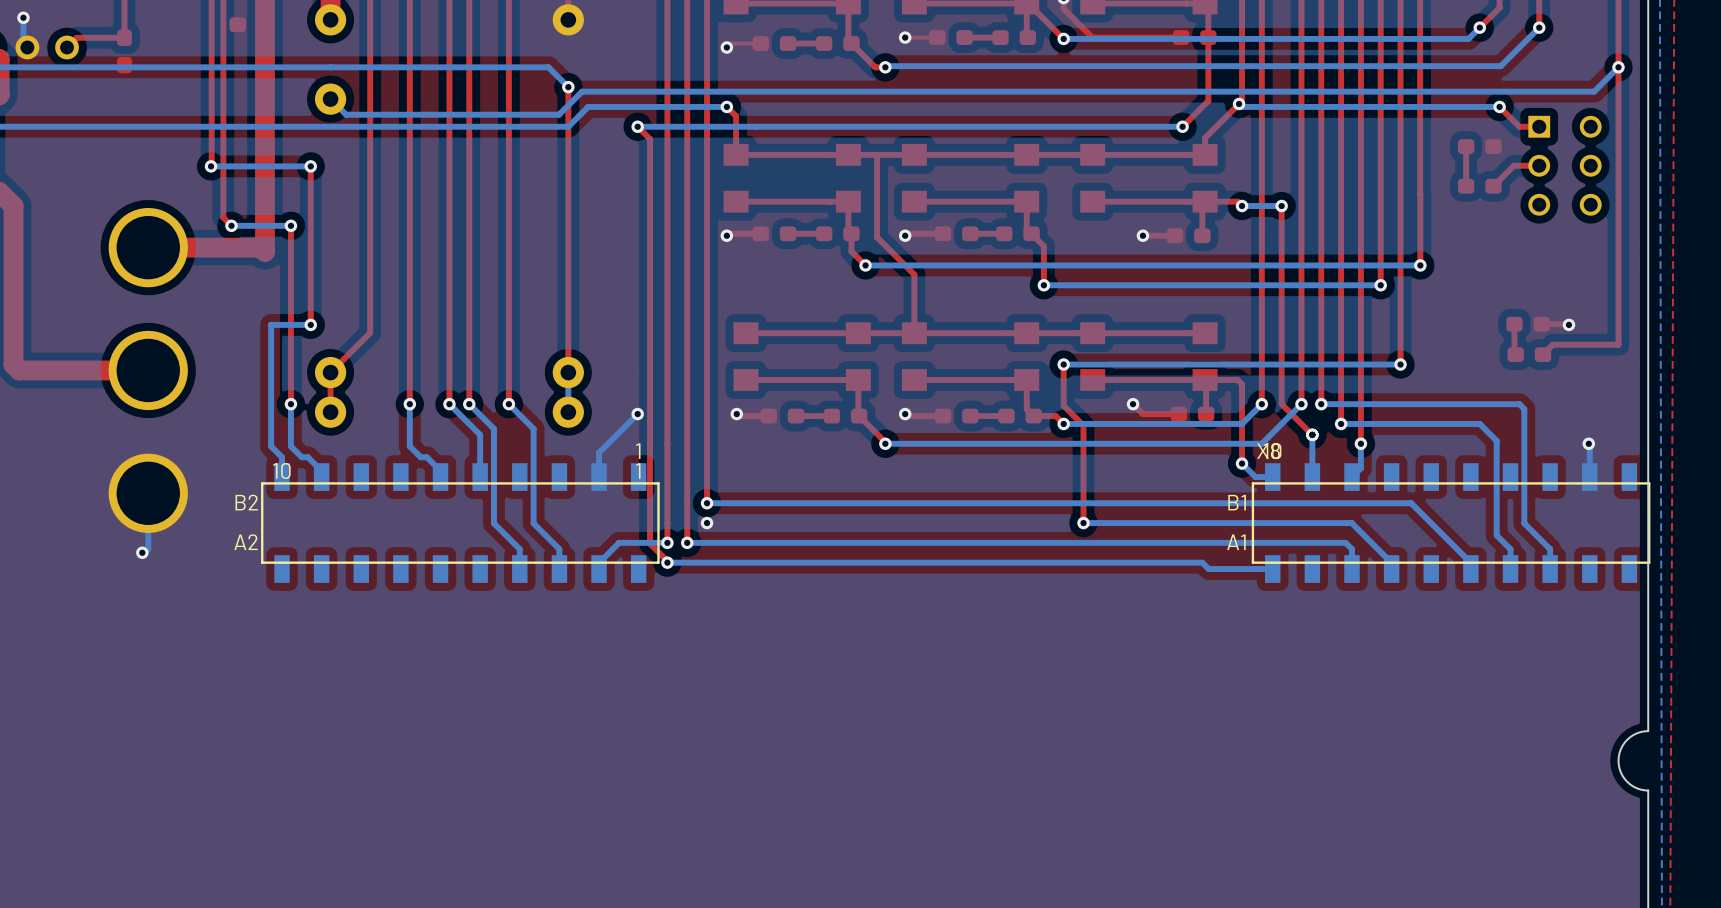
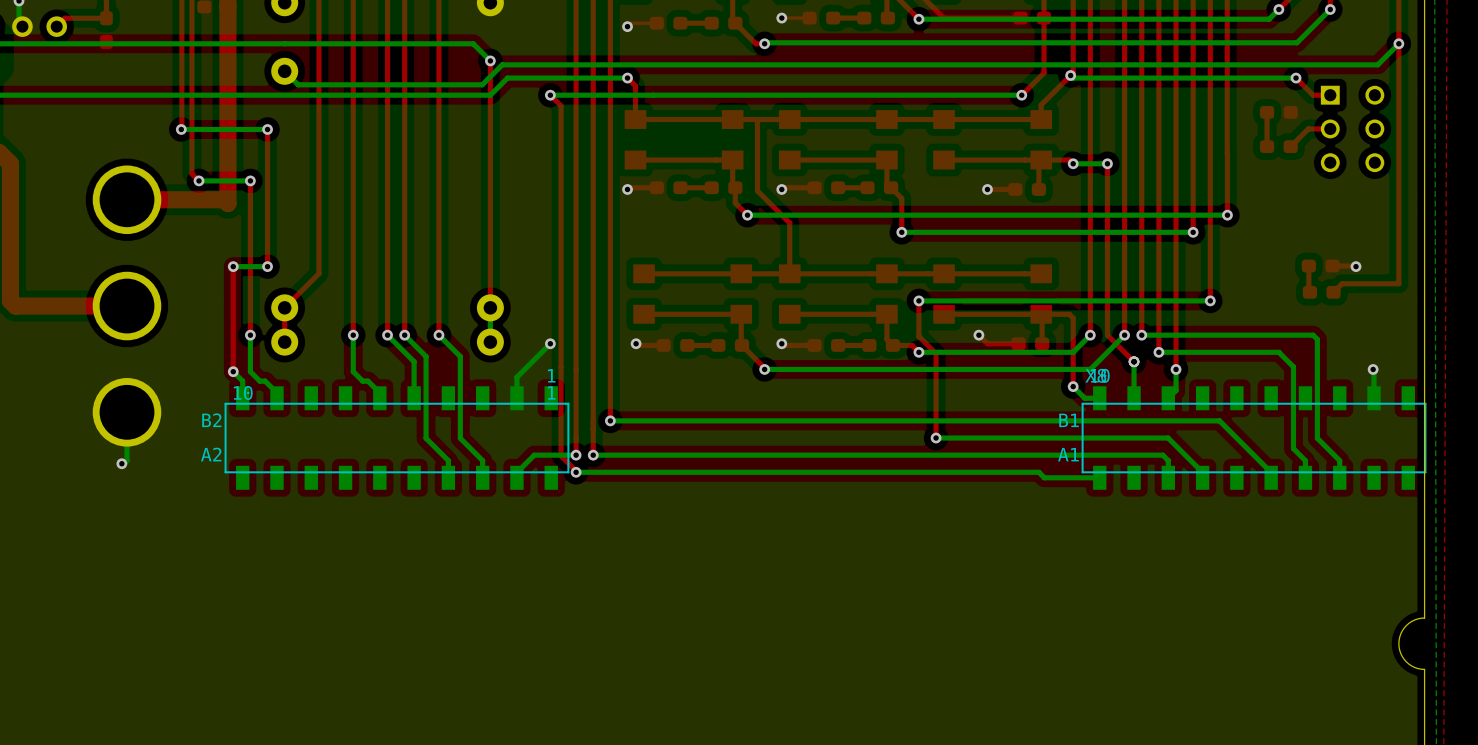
top track: none -> (233, 266) (233, 371)
bottom track: (271, 324) (271, 446) -> none
via: none -> (233, 266)
via: none -> (233, 371)
via: (707, 523) -> none

